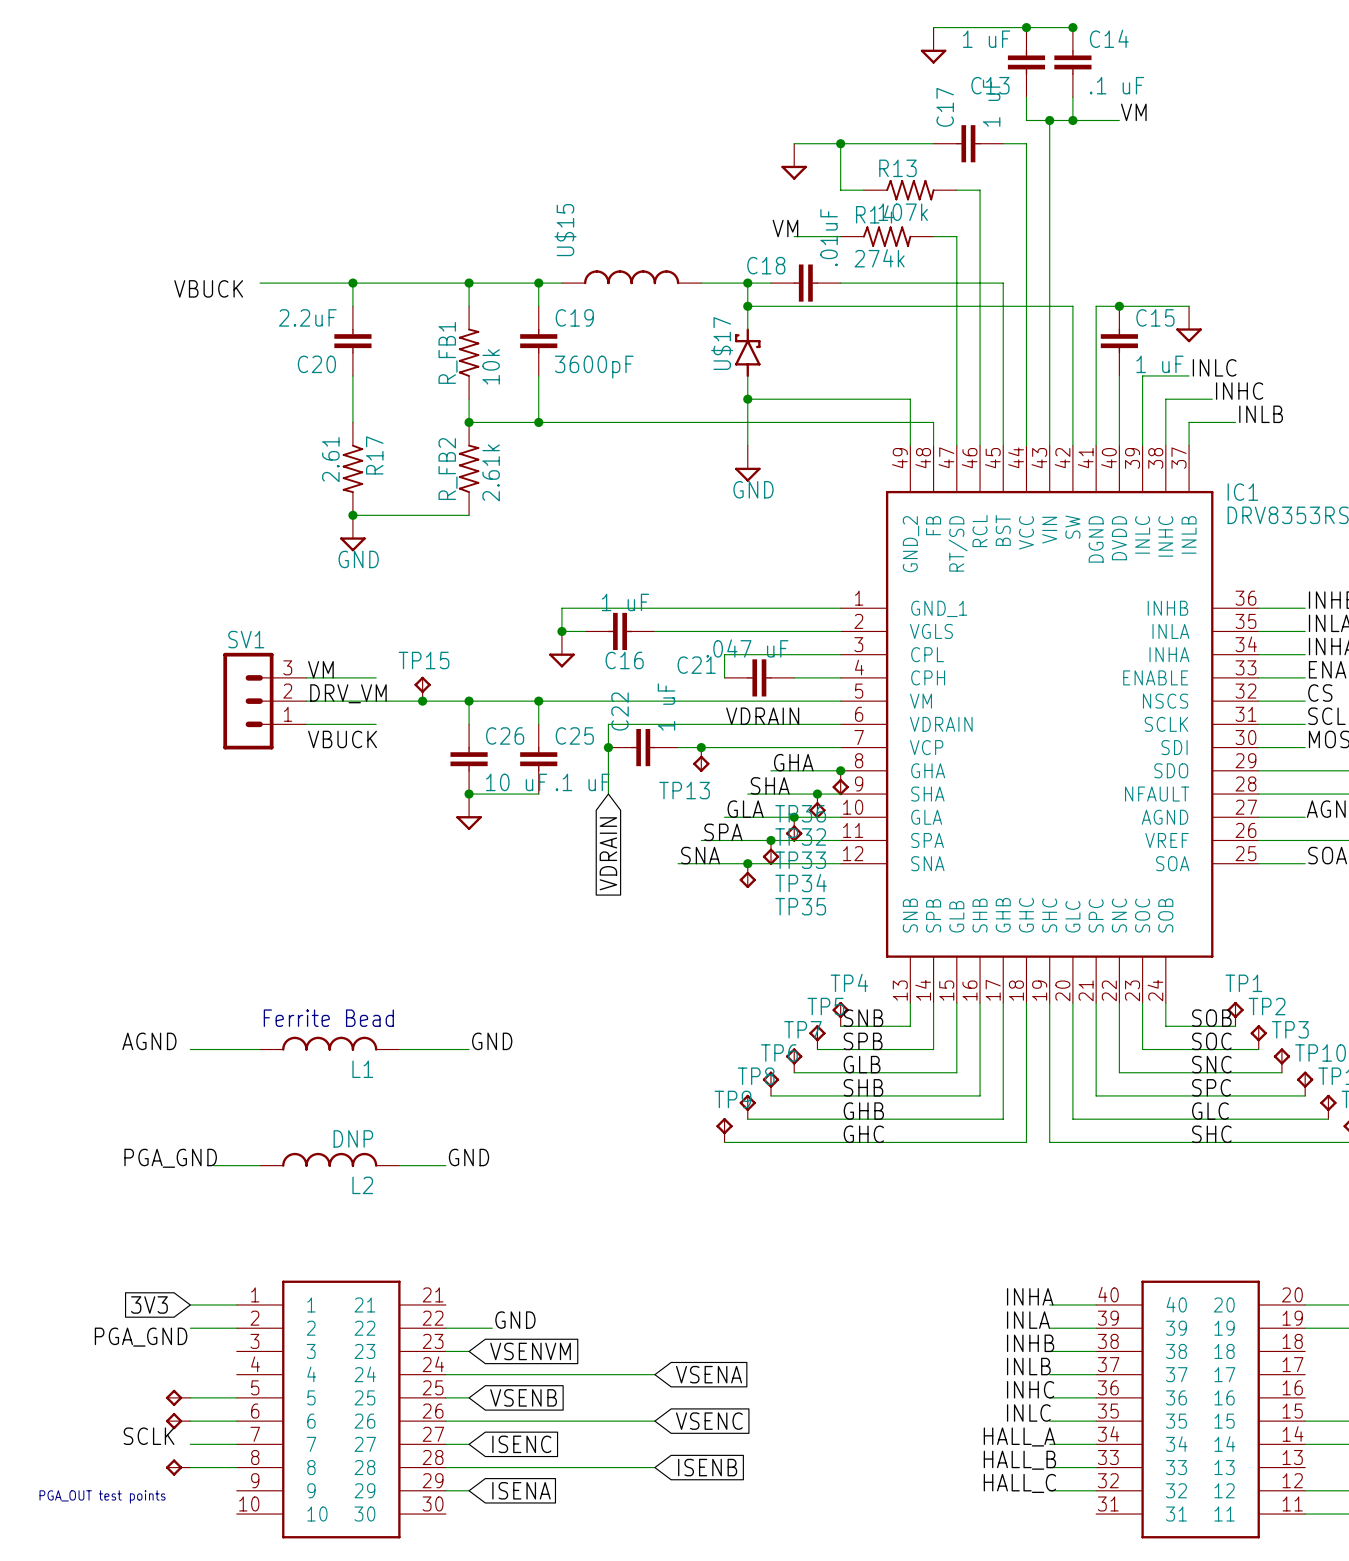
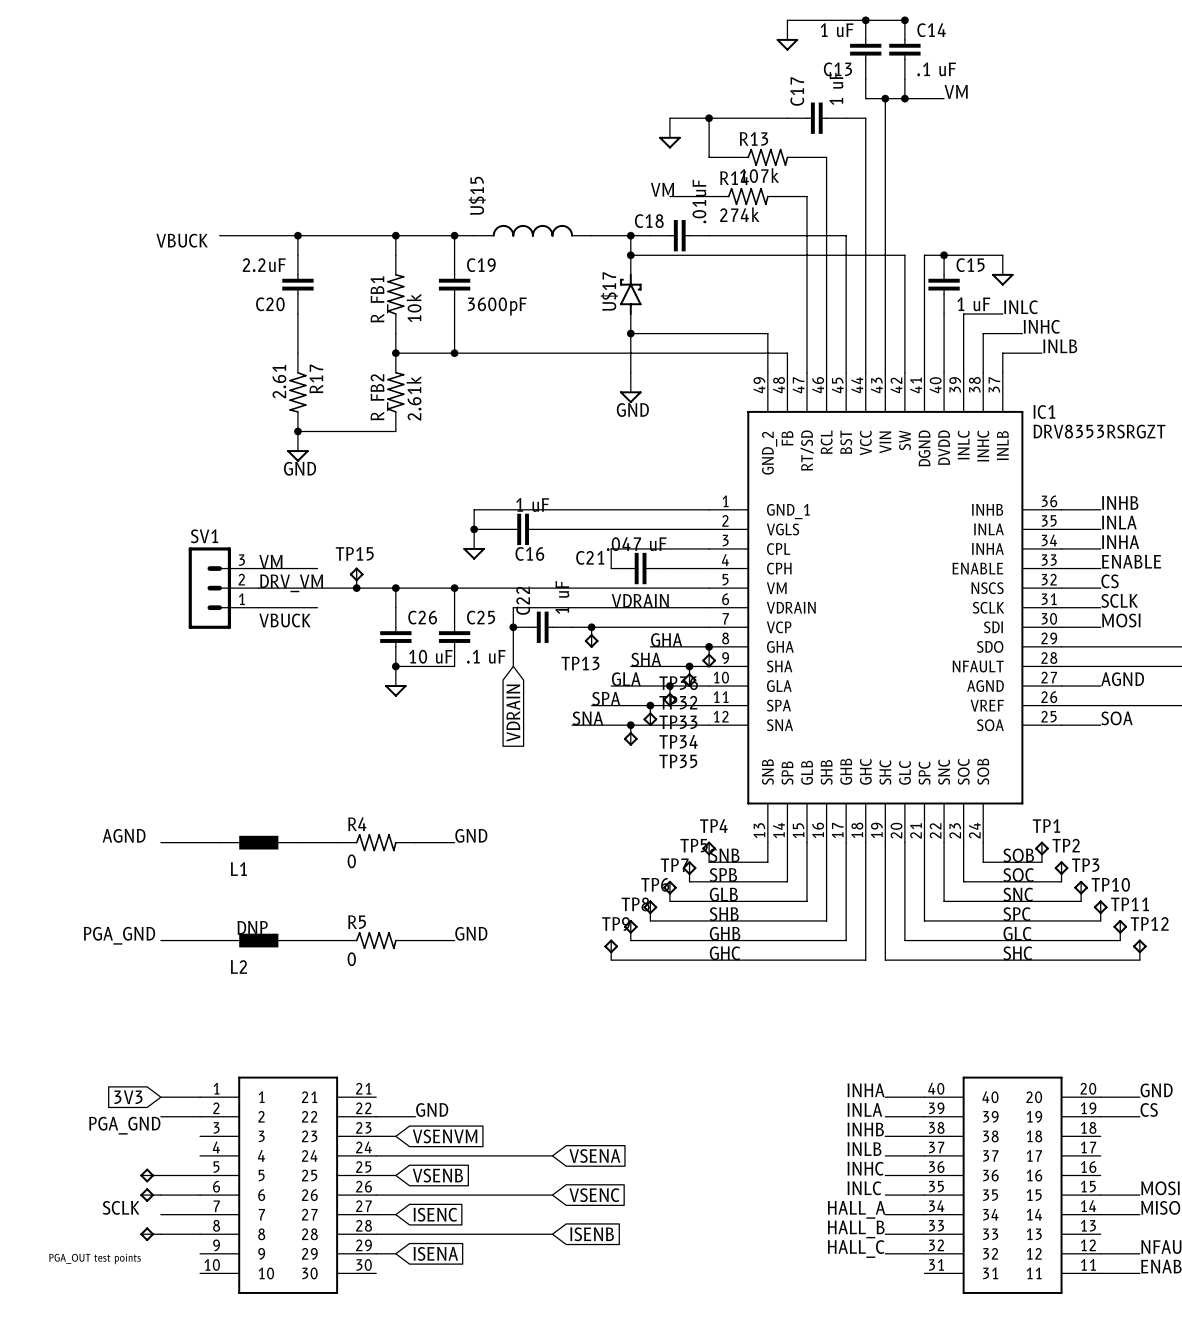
label: none -> GND (471, 835)
R4: none -> 0 (376, 842)
wire: none -> (415, 842) (454, 842)
text: Ferrite Bead (328, 1018) -> none
L1 symbol: [260, 1036, 400, 1051] -> [219, 835, 298, 850]
label position: AGND (149, 1041) -> AGND (124, 835)
label: GND (492, 1041) -> none
wire: (190, 1049) (260, 1049) -> (160, 842) (219, 842)
wire: (399, 1049) (469, 1049) -> (160, 940) (219, 940)
L1 name position: L1 (362, 1069) -> L1 (238, 869)
label: none -> GND (471, 933)
R5: none -> 0 (376, 940)
wire: none -> (415, 940) (454, 940)
L2 value position: DNP (353, 1138) -> DNP (252, 927)
L2 symbol: [260, 1152, 400, 1167] -> [219, 933, 298, 948]
label: GND (468, 1157) -> none
label position: PGA_GND (170, 1158) -> PGA_GND (119, 935)
wire: (213, 1165) (260, 1165) -> (297, 842) (337, 842)
wire: (399, 1165) (445, 1165) -> (297, 940) (337, 940)
L2 name position: L2 (362, 1185) -> L2 (238, 966)

